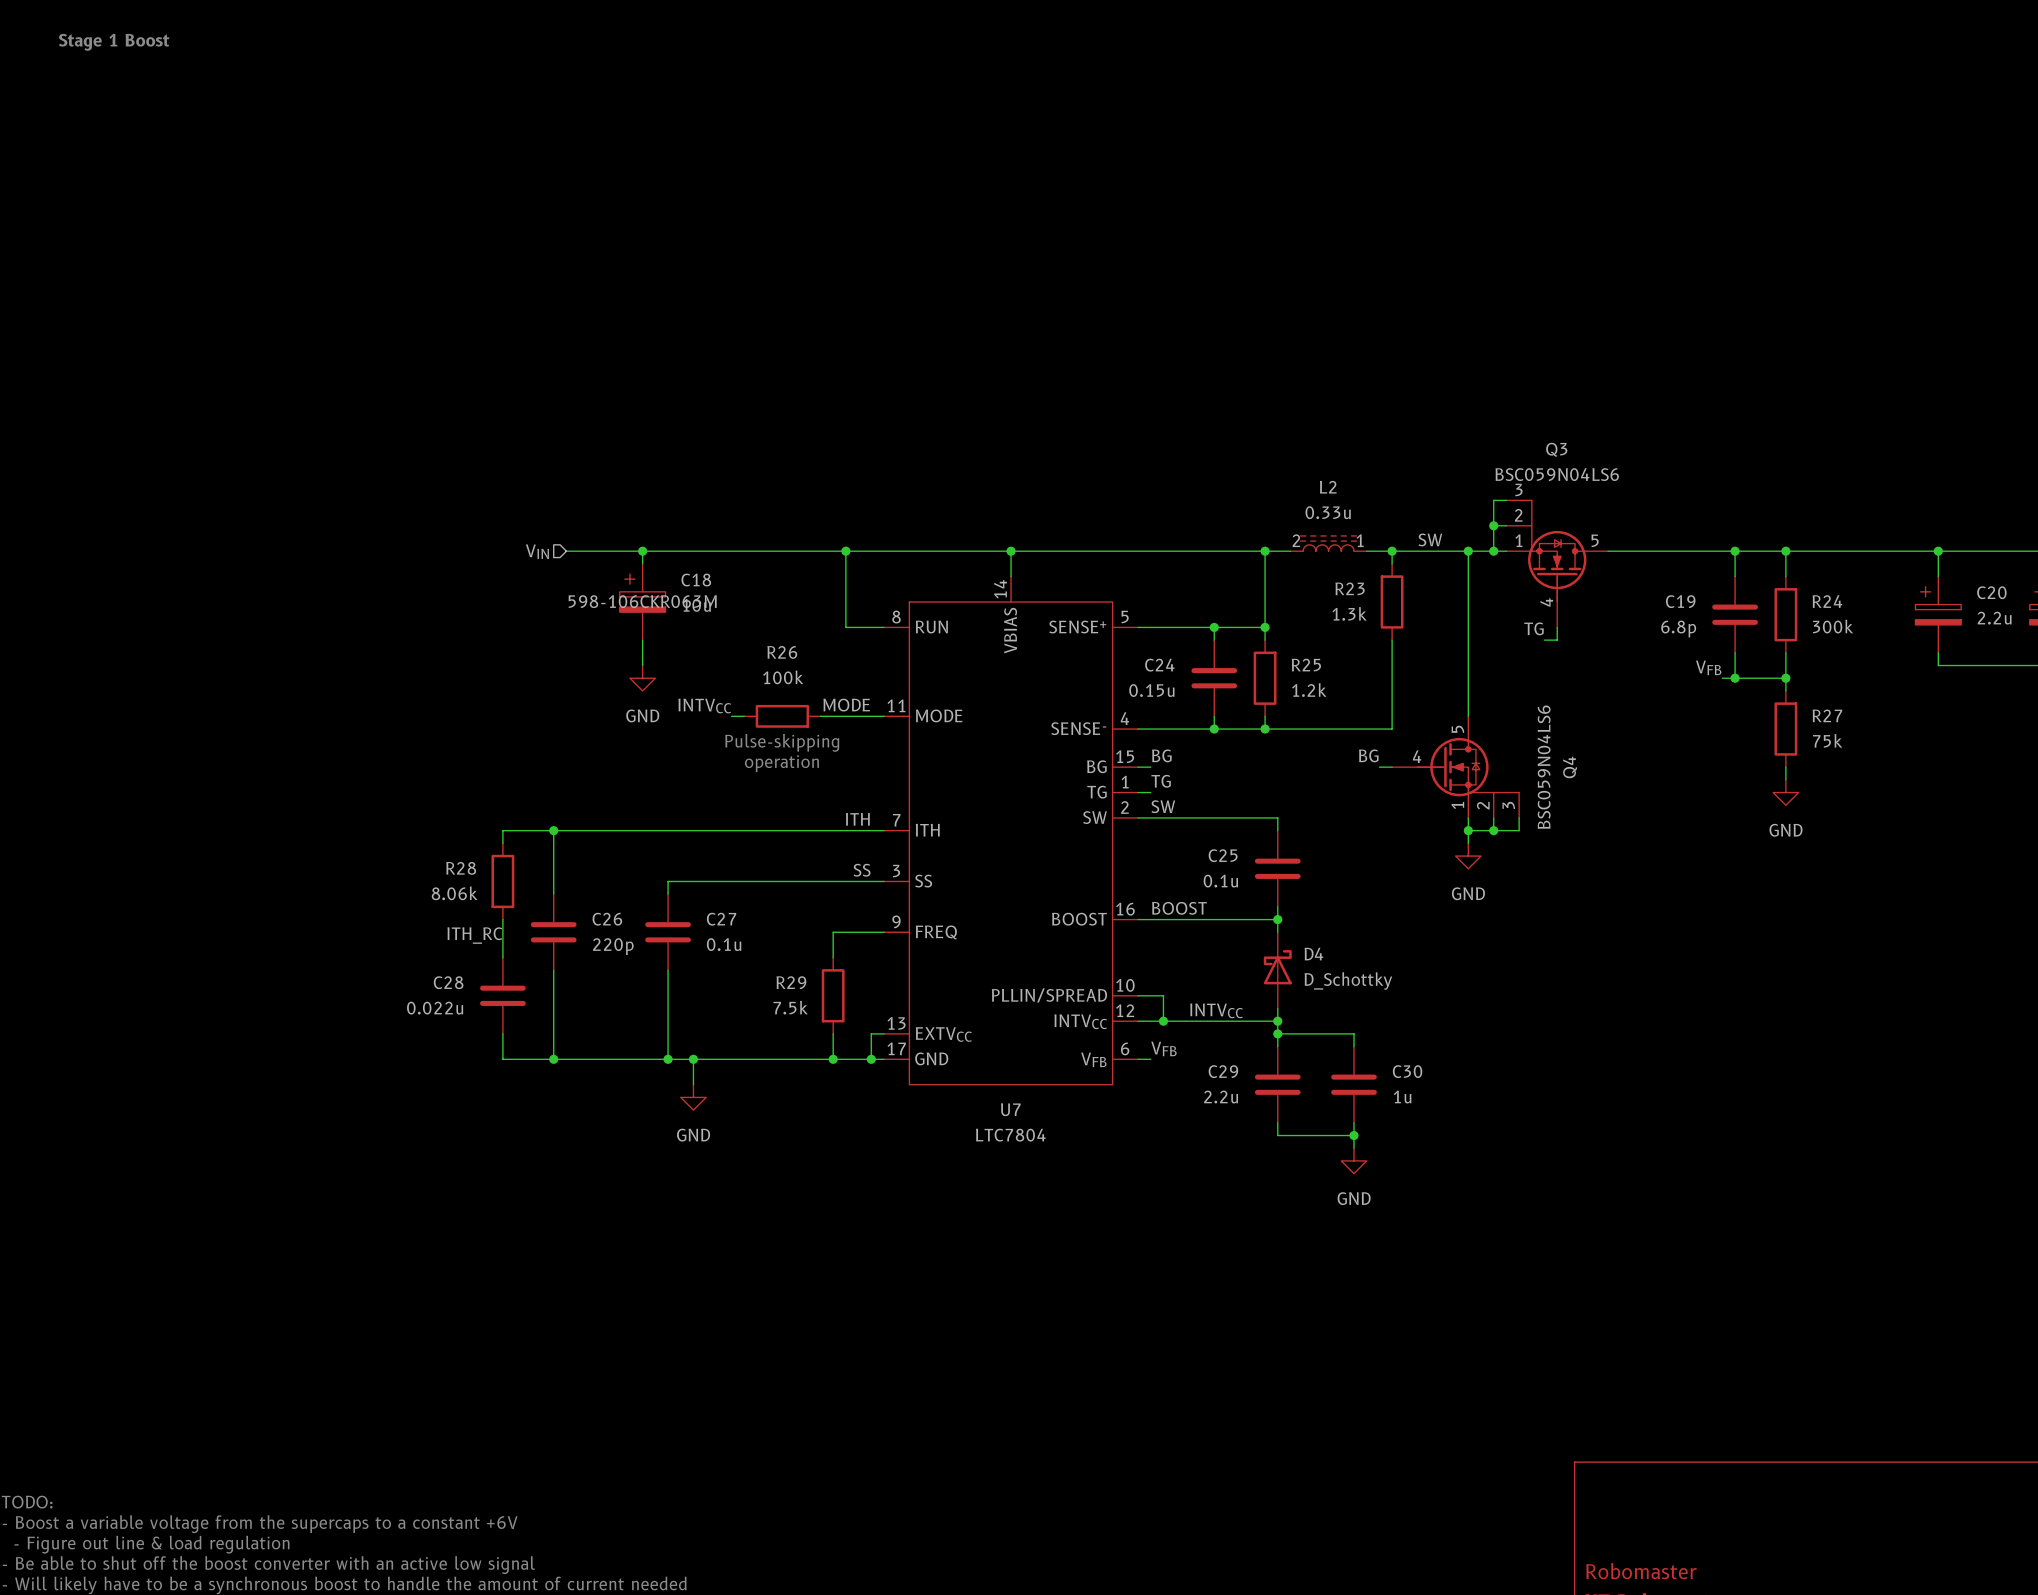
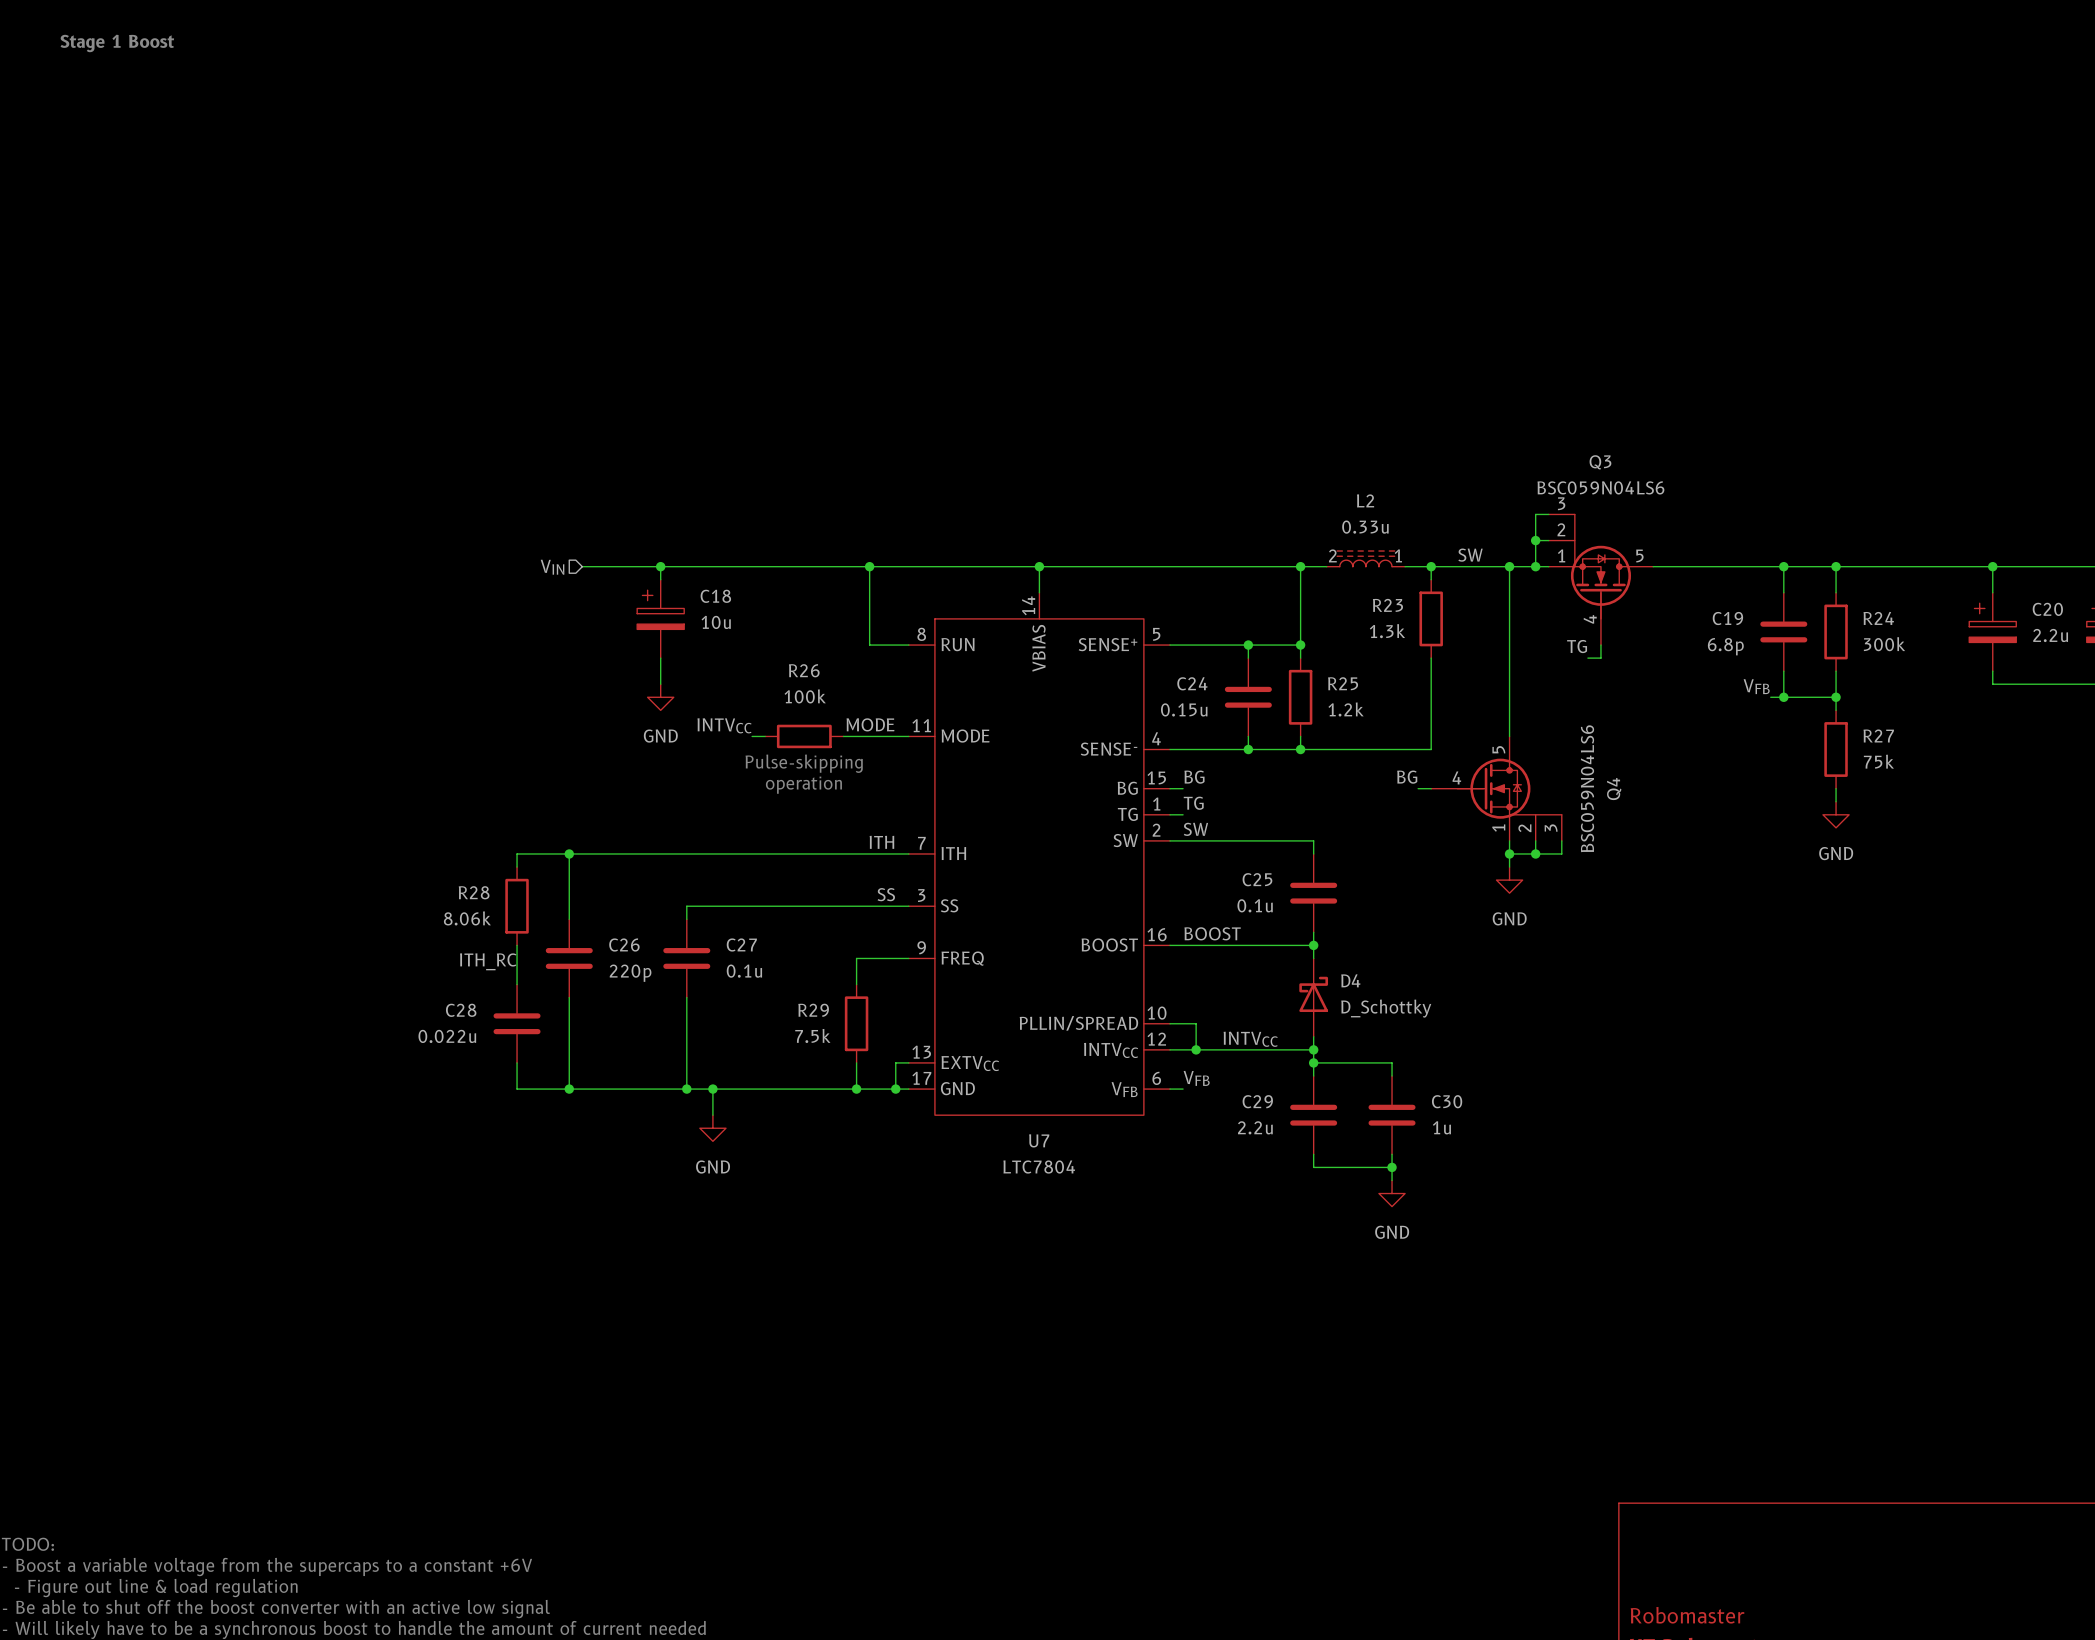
C18 text: 598-106CKR063M (642, 601) -> none

